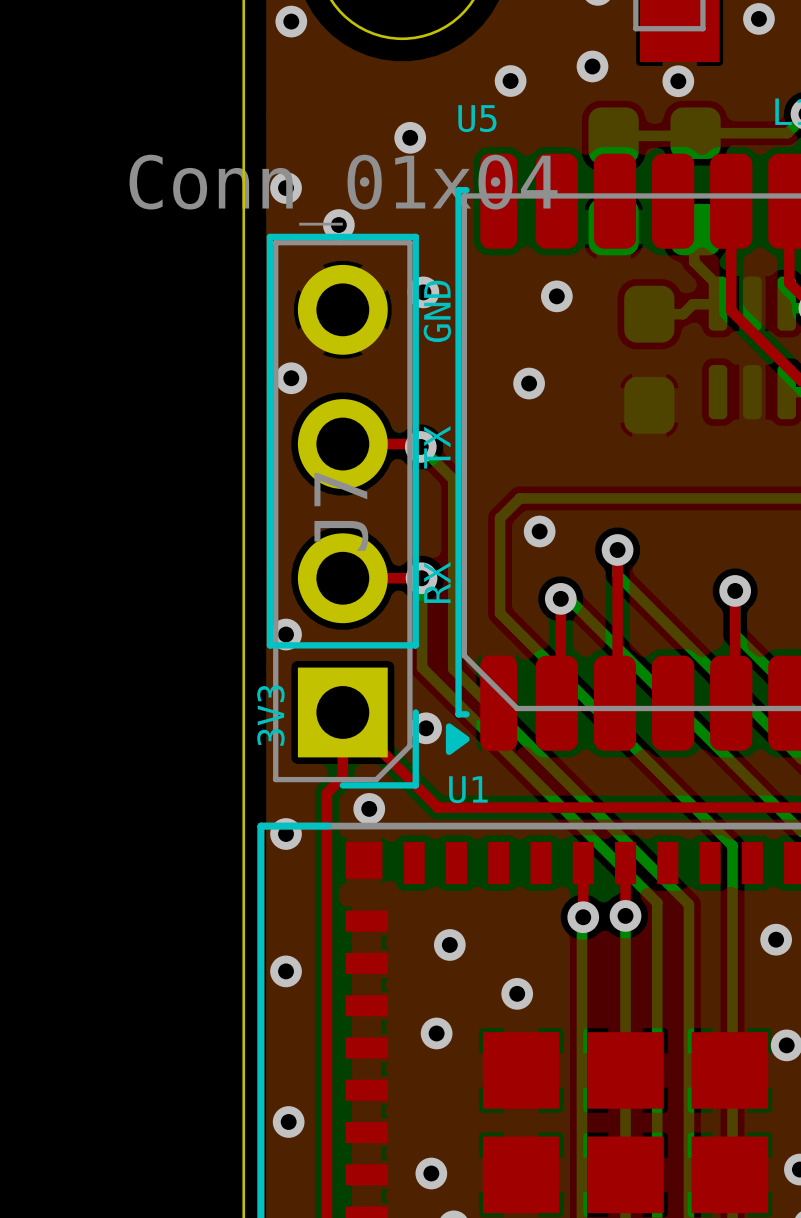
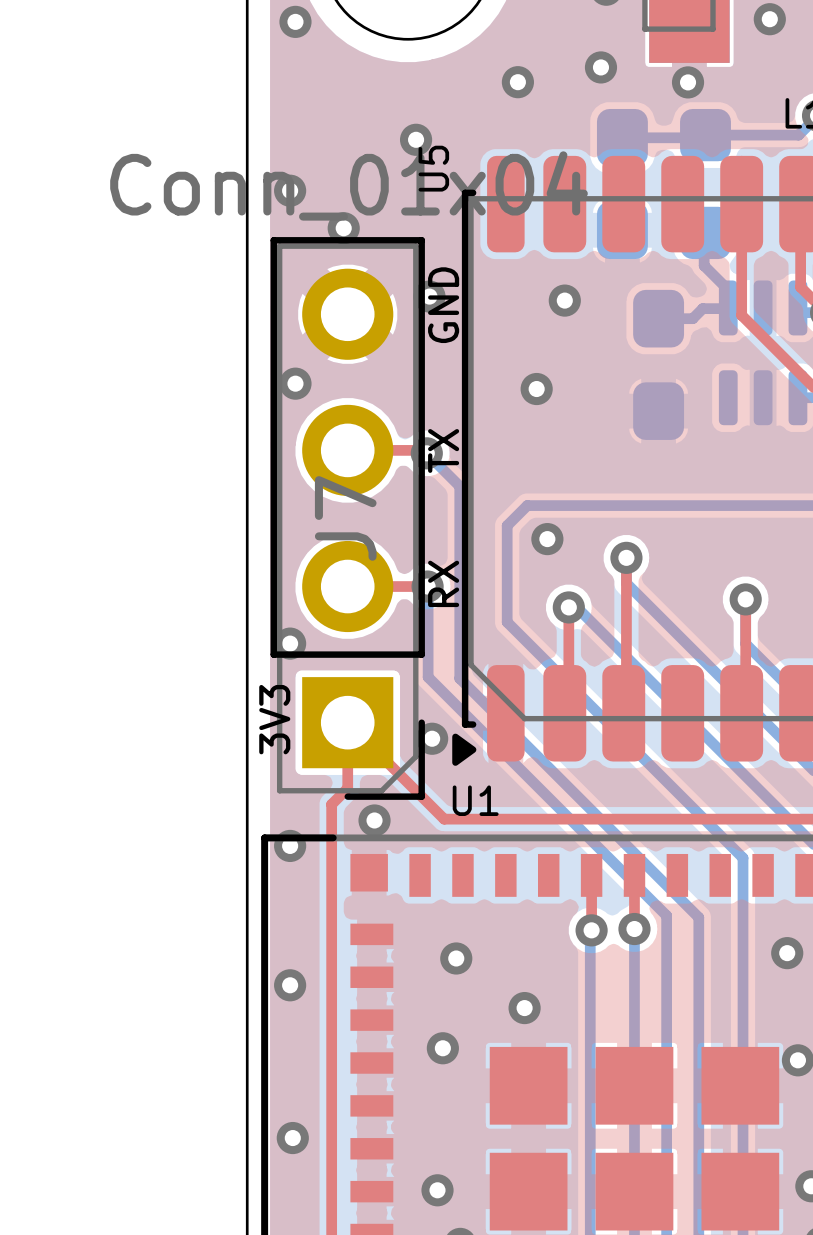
U5 name rotation: 0° (477, 118) -> 90° counterclockwise (433, 168)
U5 name position: U5 (477, 118) -> U5 (433, 168)

